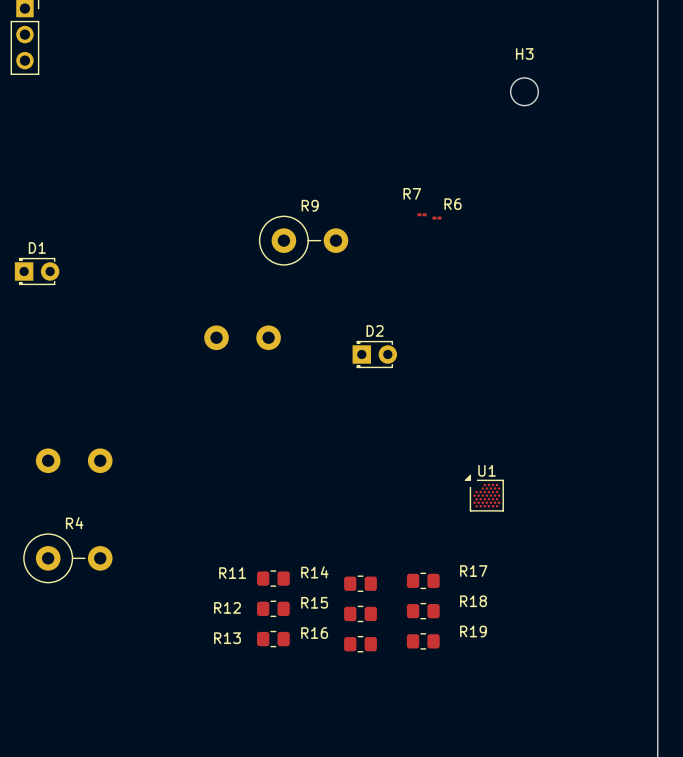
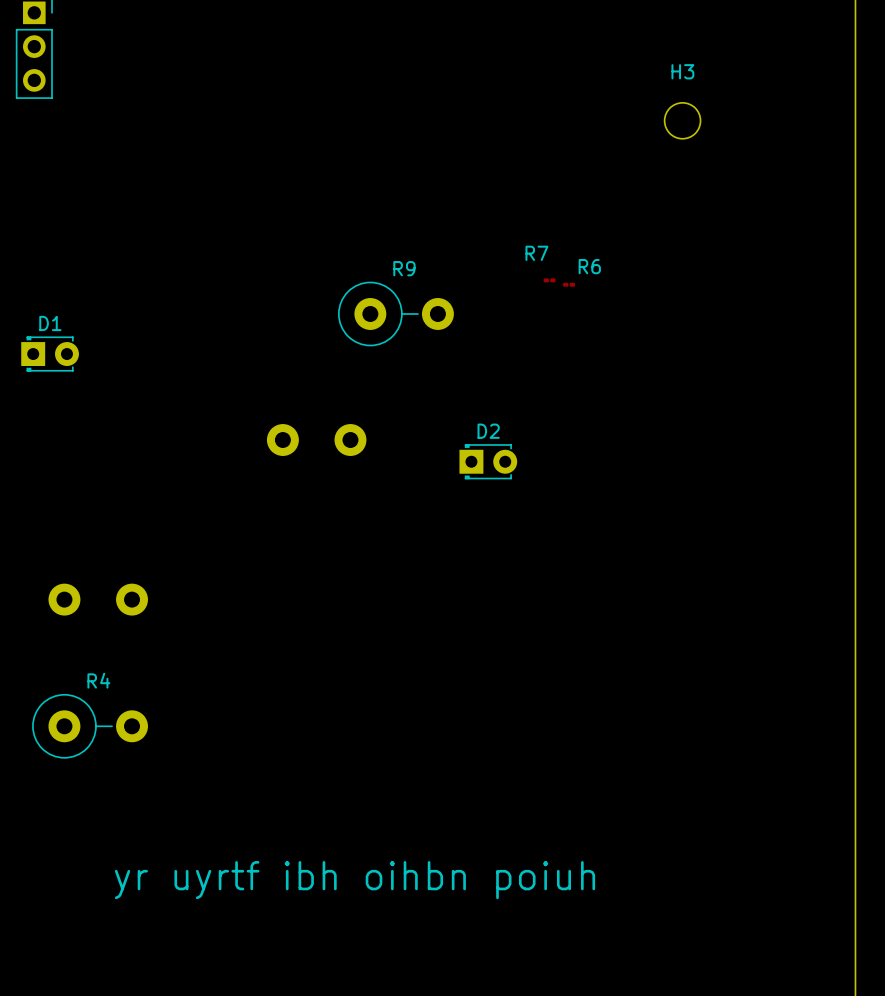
U1: (484, 493) -> none
R11: (273, 578) -> none
R17: (423, 580) -> none
R14: (360, 583) -> none
R12: (273, 608) -> none
R18: (423, 611) -> none
R15: (360, 613) -> none
R13: (273, 639) -> none
R19: (423, 641) -> none
R16: (360, 644) -> none
text: none -> yr uyrtf ibh oihbn poiuh (354, 880)

